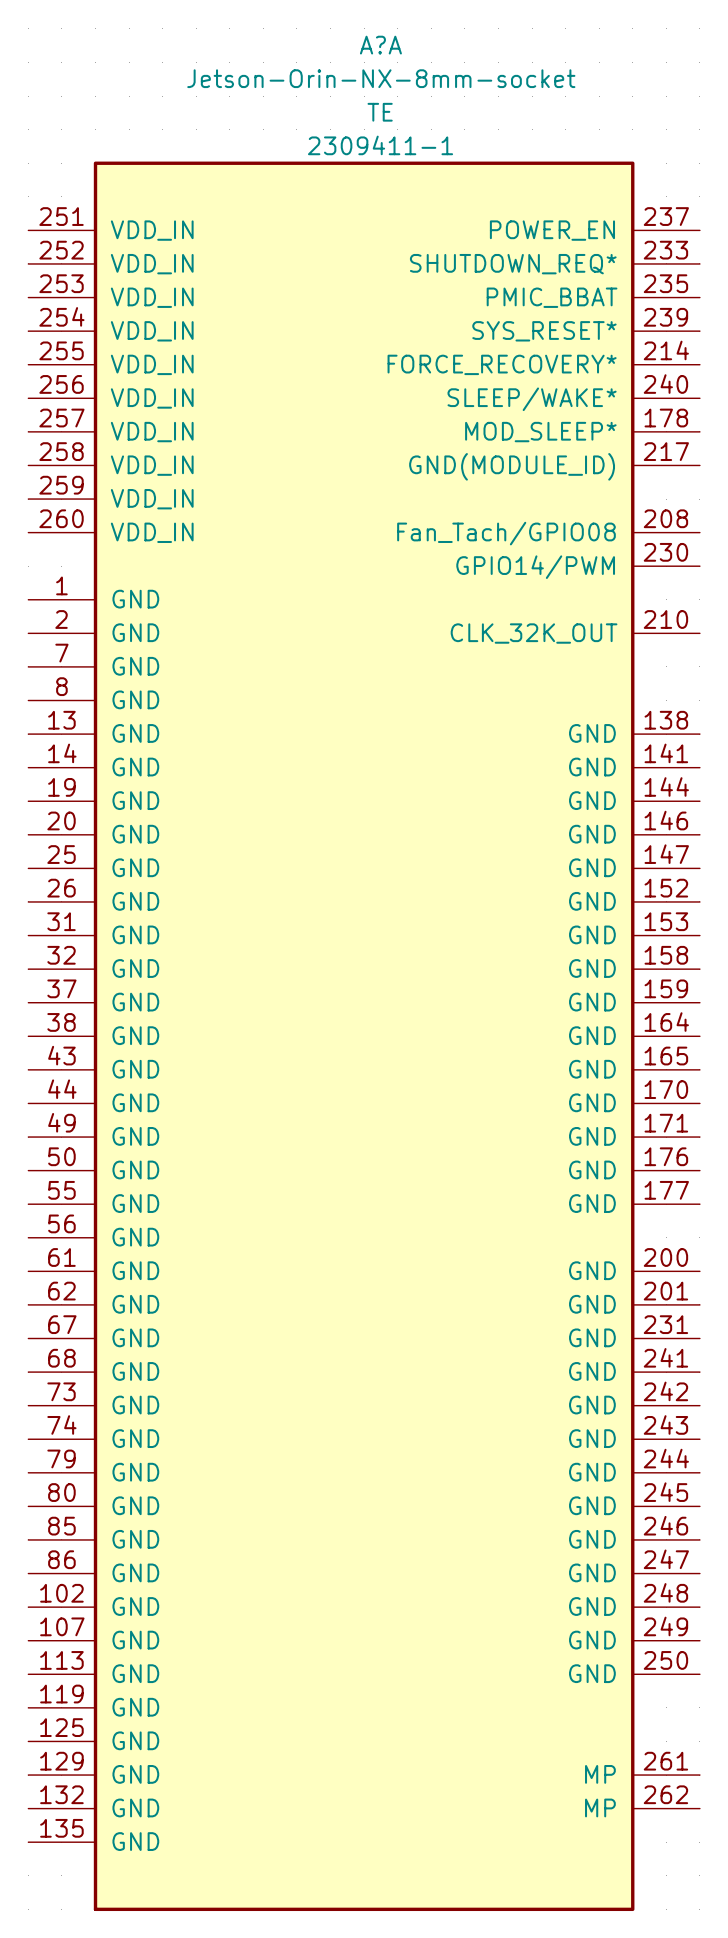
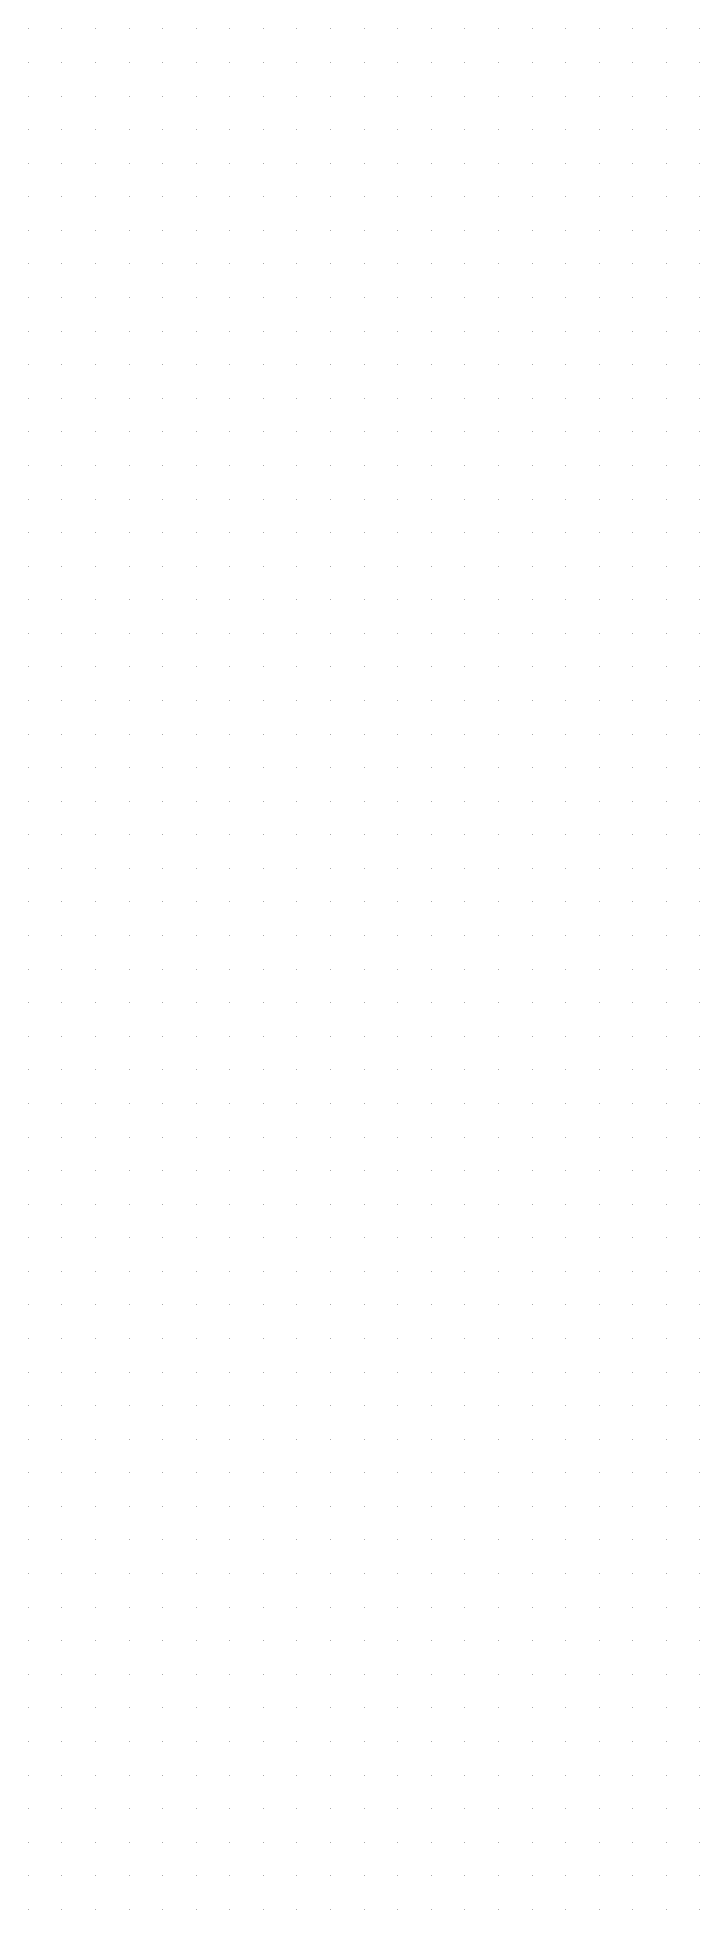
A?A: Jetson-Orin-NX-8mm-socket (364, 1036) -> none

